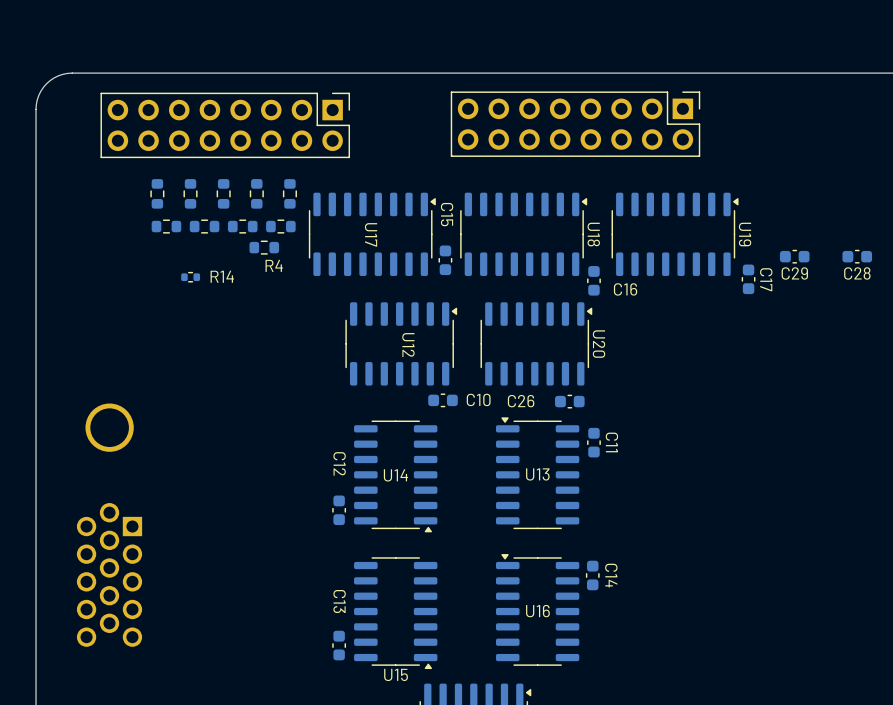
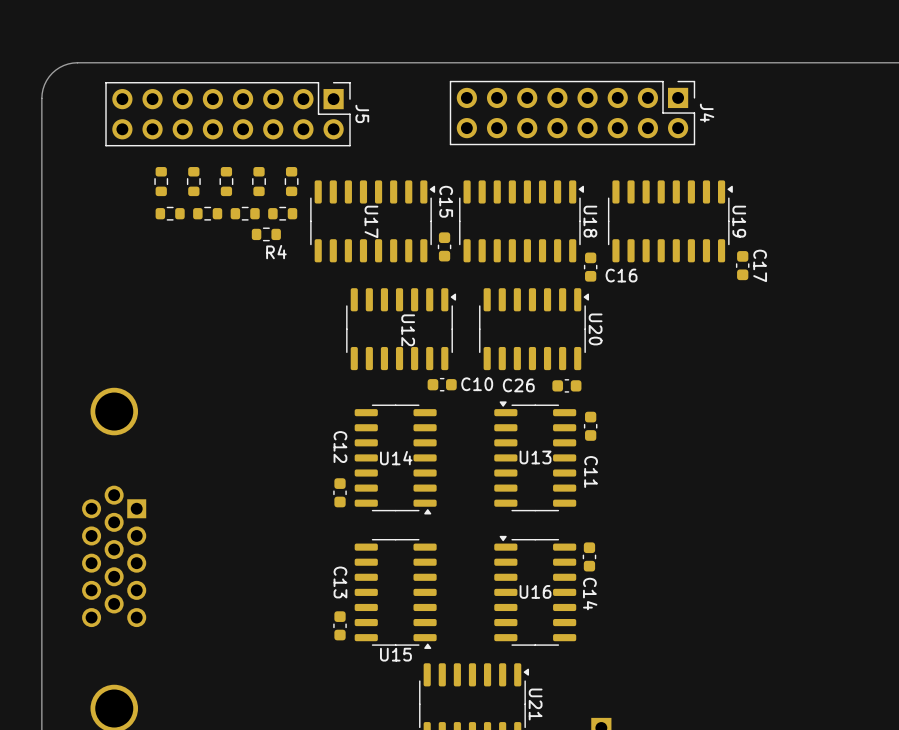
J4 name: none -> J4 (707, 113)
J5 name: none -> J5 (362, 113)
C29: (794, 256) -> none
C28: (857, 256) -> none
R14: (190, 277) -> none
C11 name position: C11 (611, 442) -> C11 (591, 472)
C14 name position: C14 (611, 575) -> C14 (590, 594)

